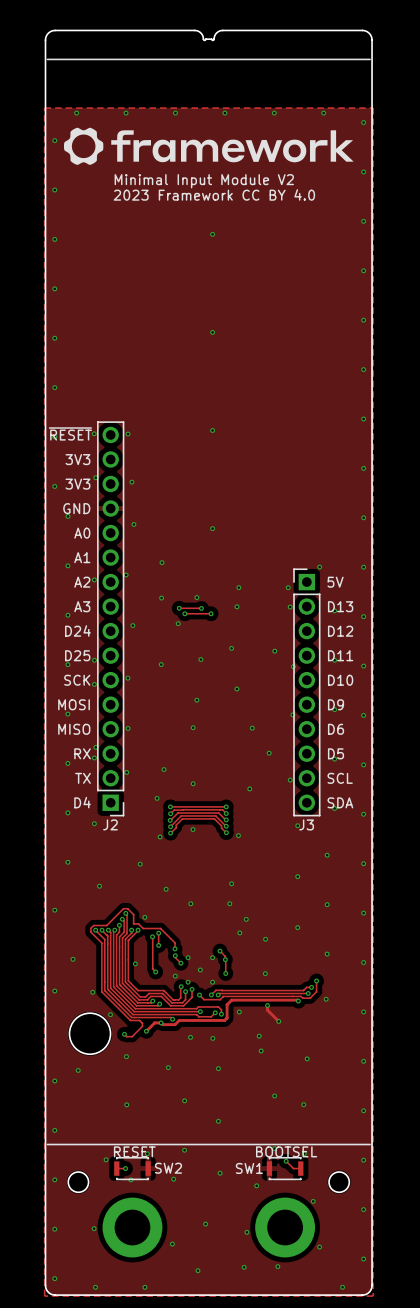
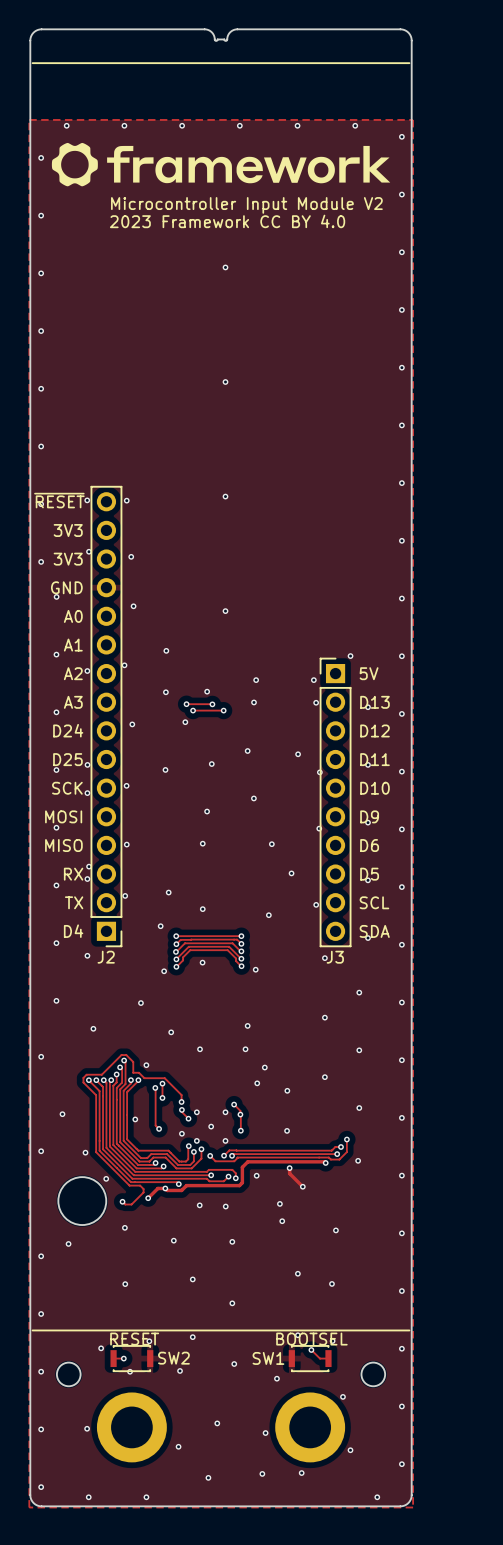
text: Minimal Input Module V2 (204, 181) -> Microcontroller Input Module V2 (246, 205)

